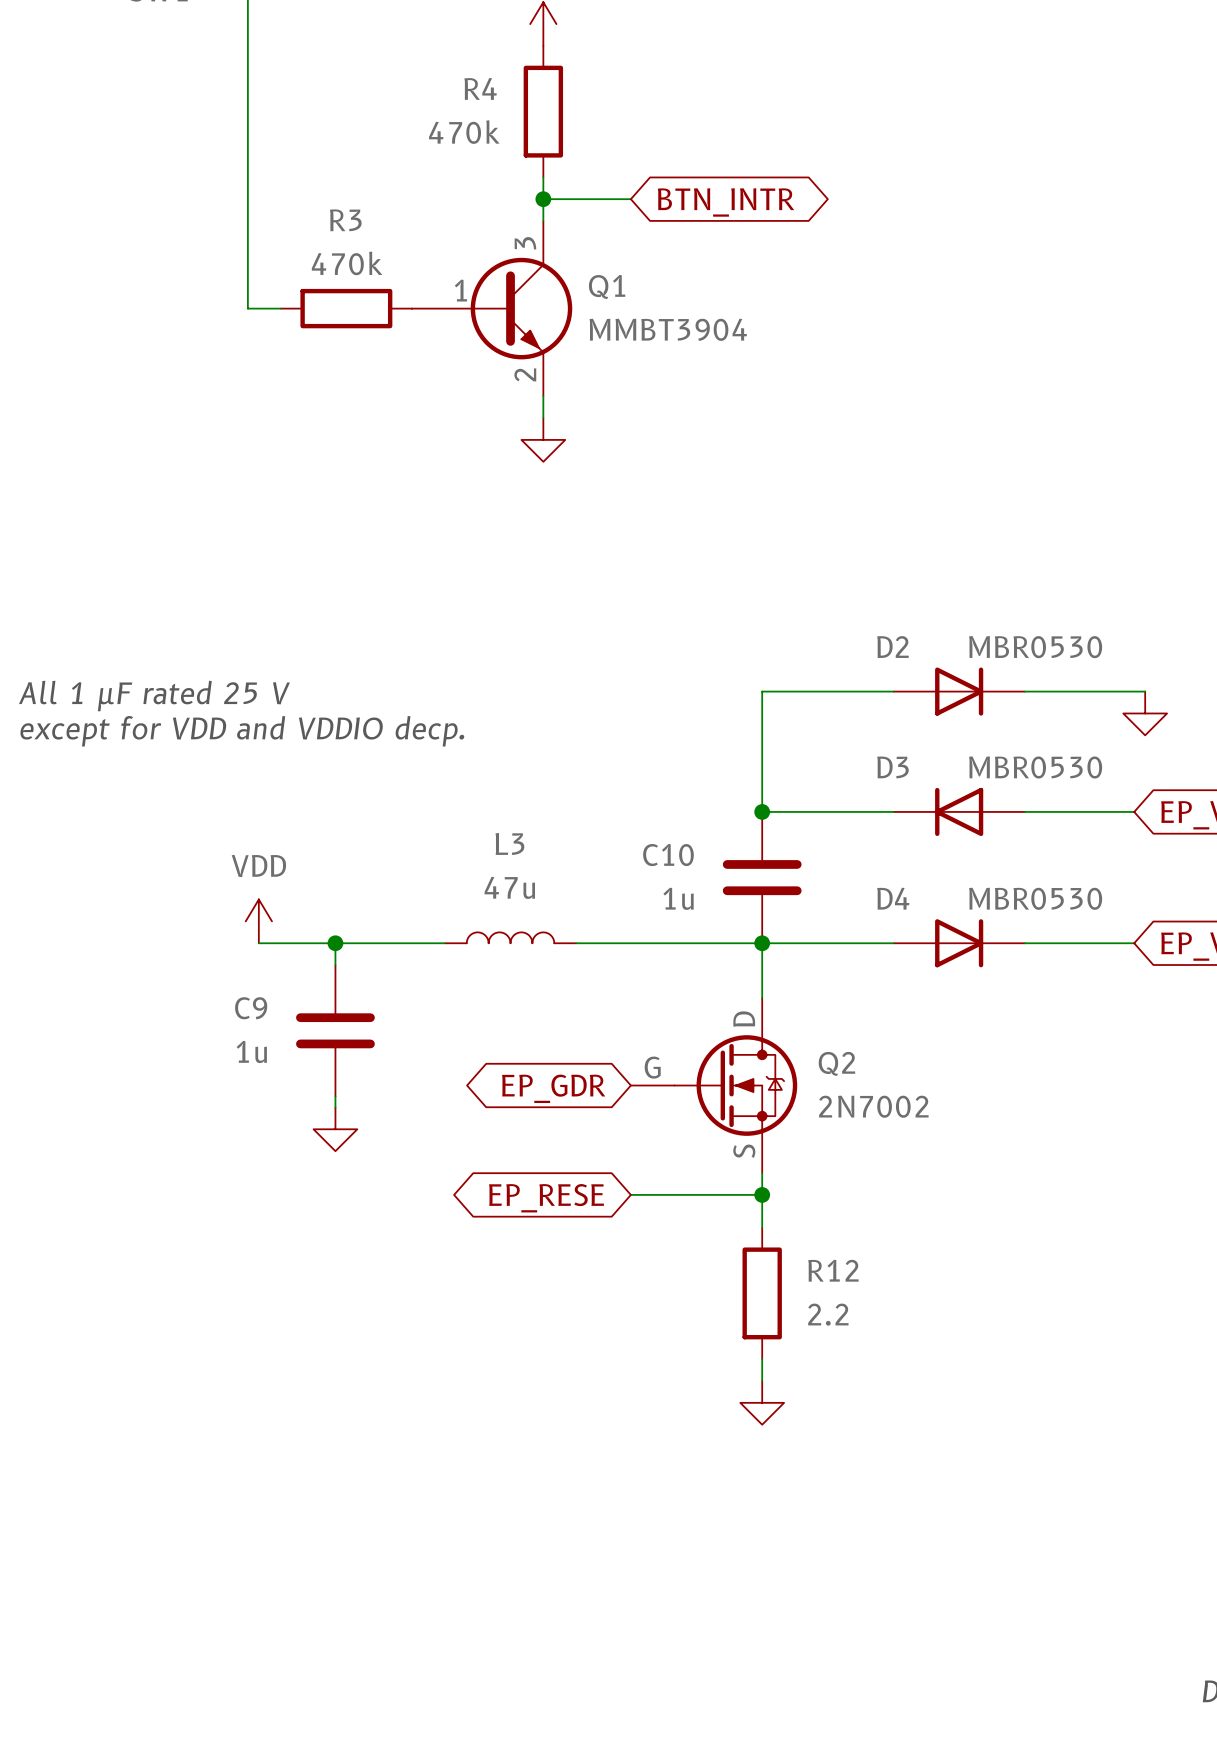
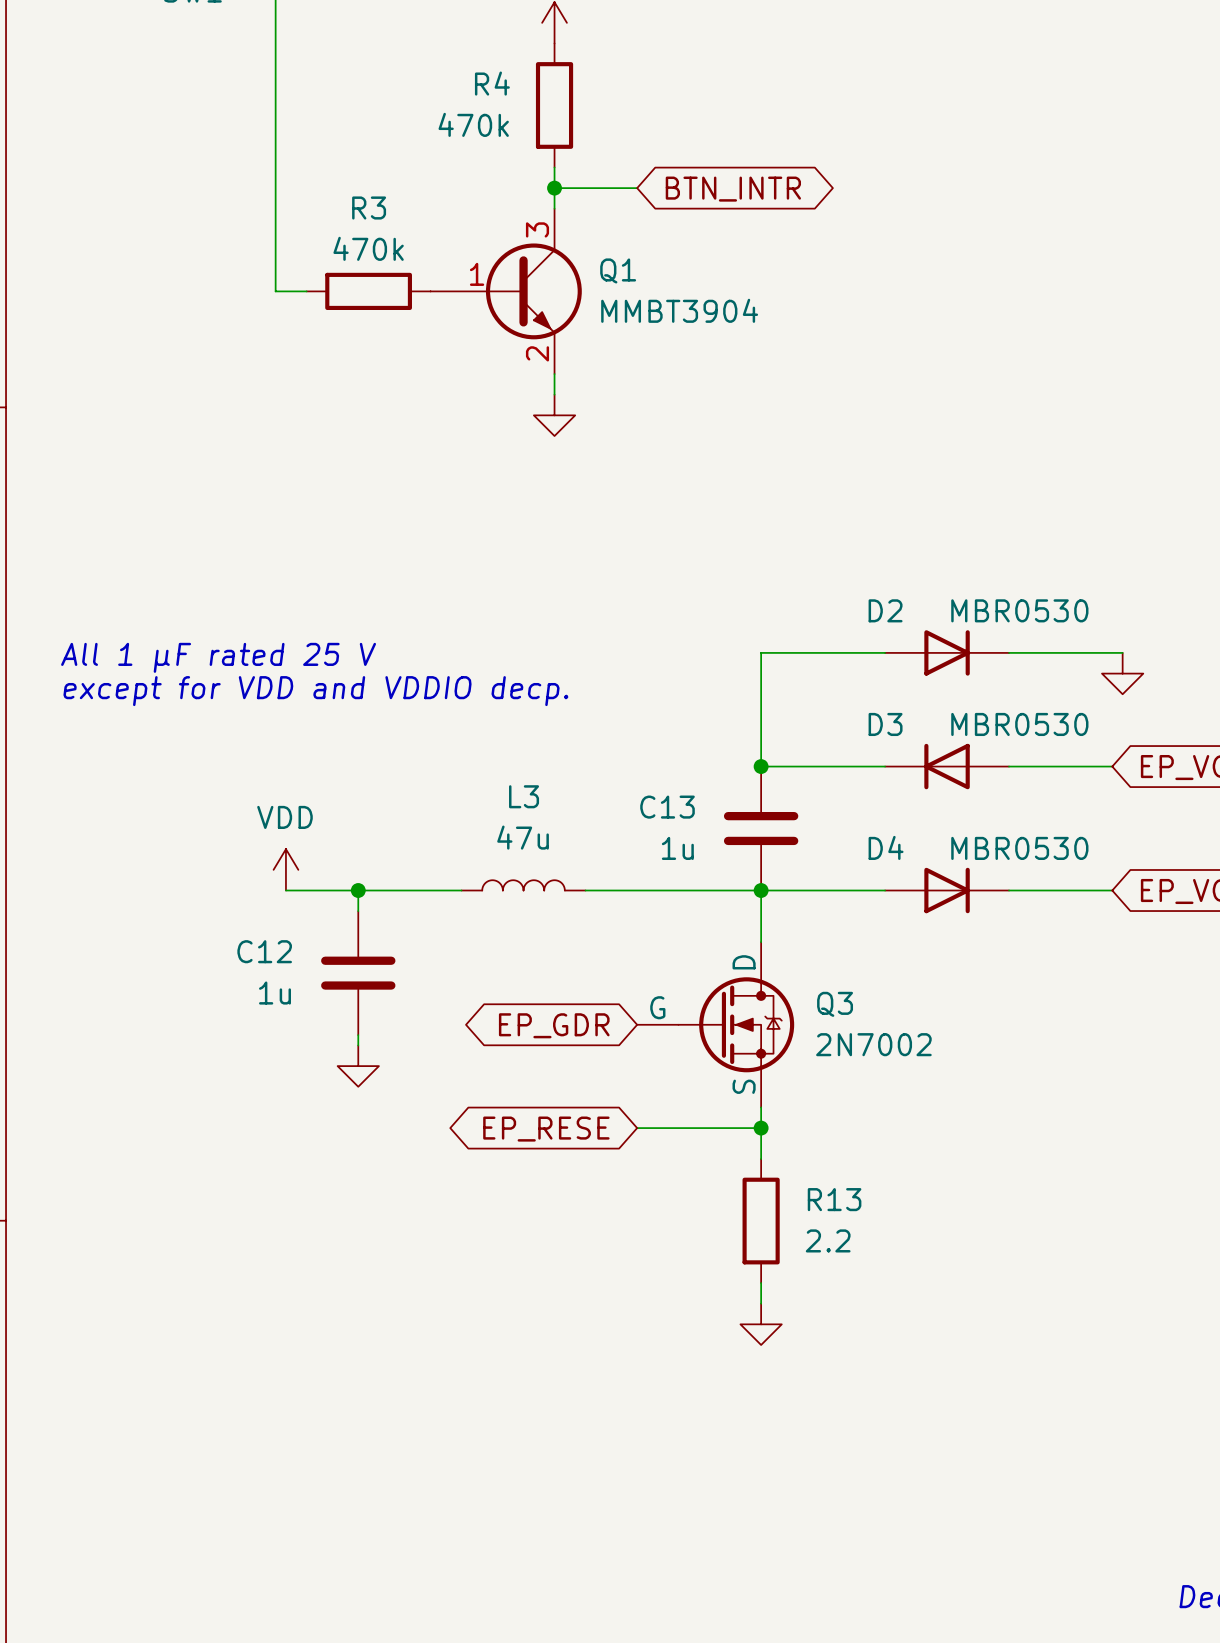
C10 name: C10 (668, 855) -> C13 (667, 807)
C9 name: C9 (251, 1008) -> C12 (264, 951)
Q2 name: Q2 (836, 1063) -> Q3 (835, 1004)
R12 name: R12 (833, 1270) -> R13 (834, 1199)

